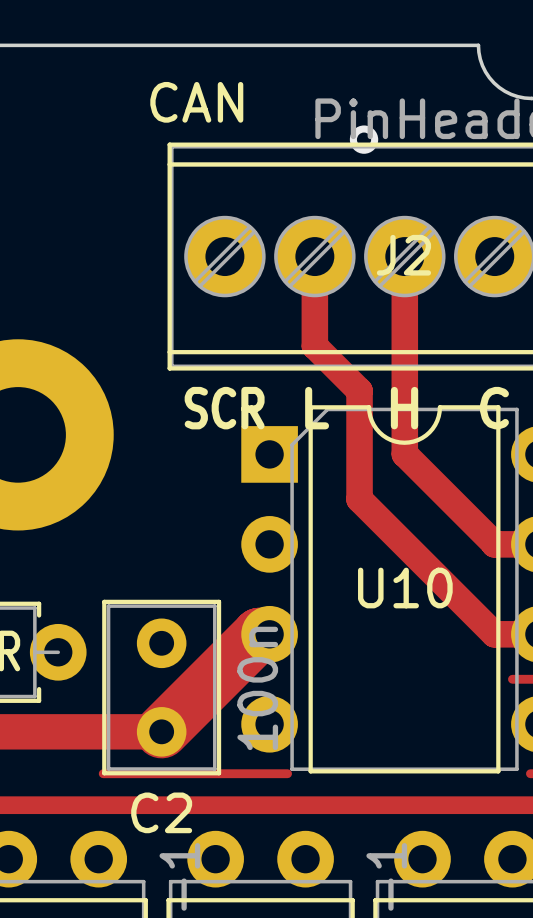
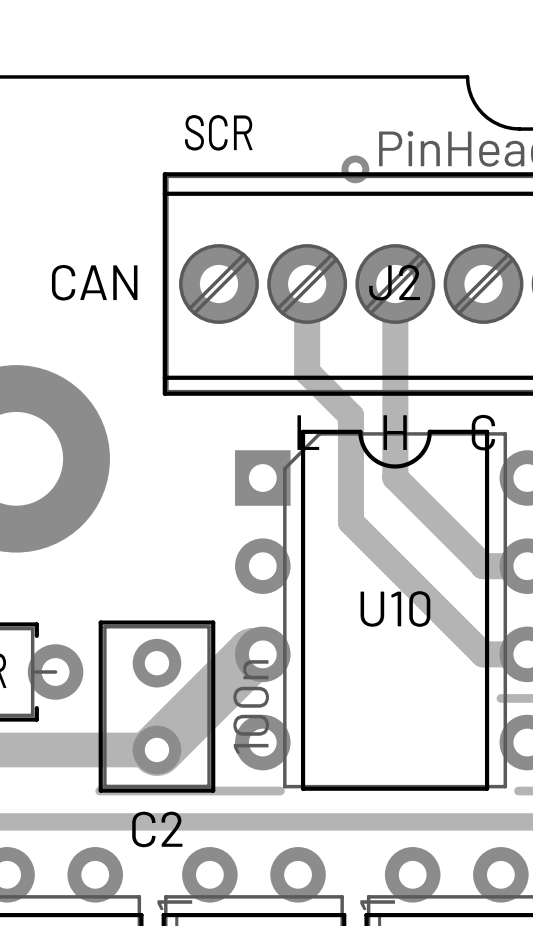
J2 value position: CAN (196, 102) -> CAN (94, 282)
text position: SCR (224, 408) -> SCR (218, 132)

